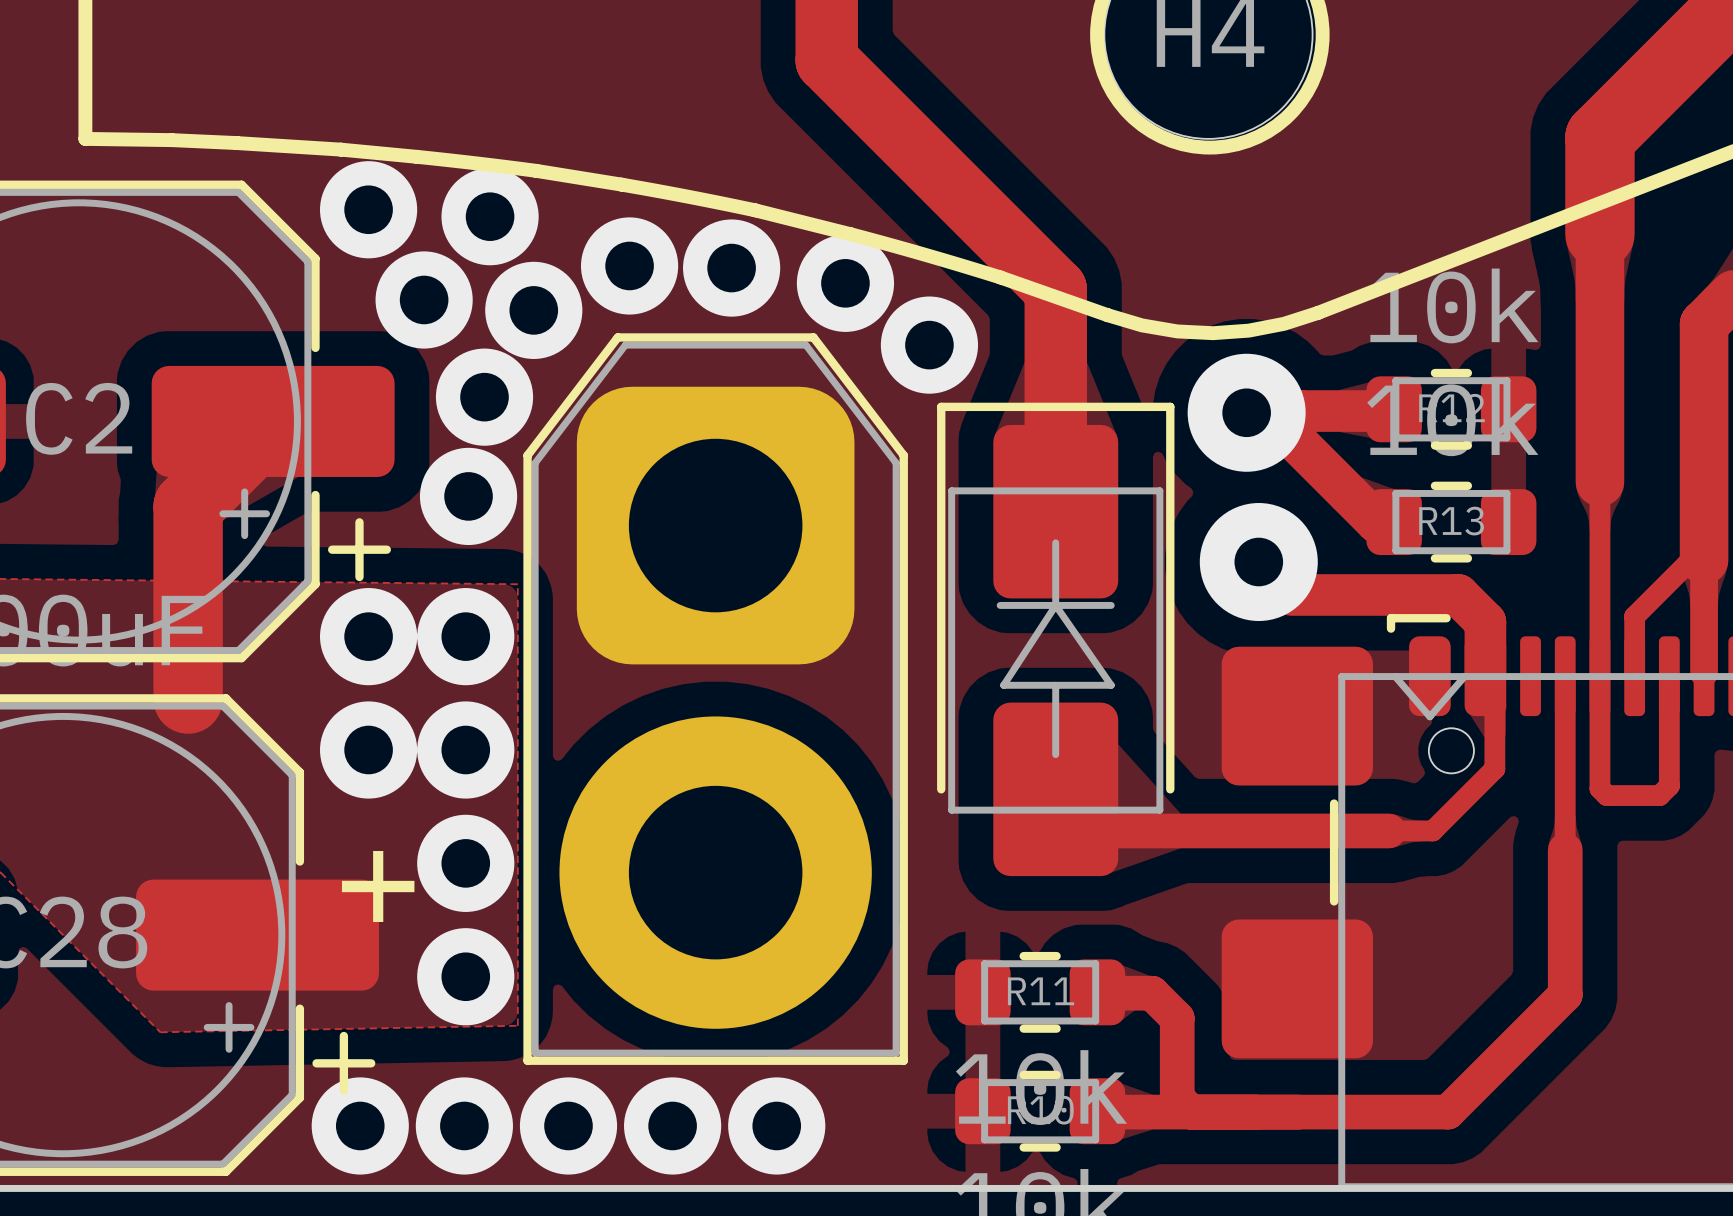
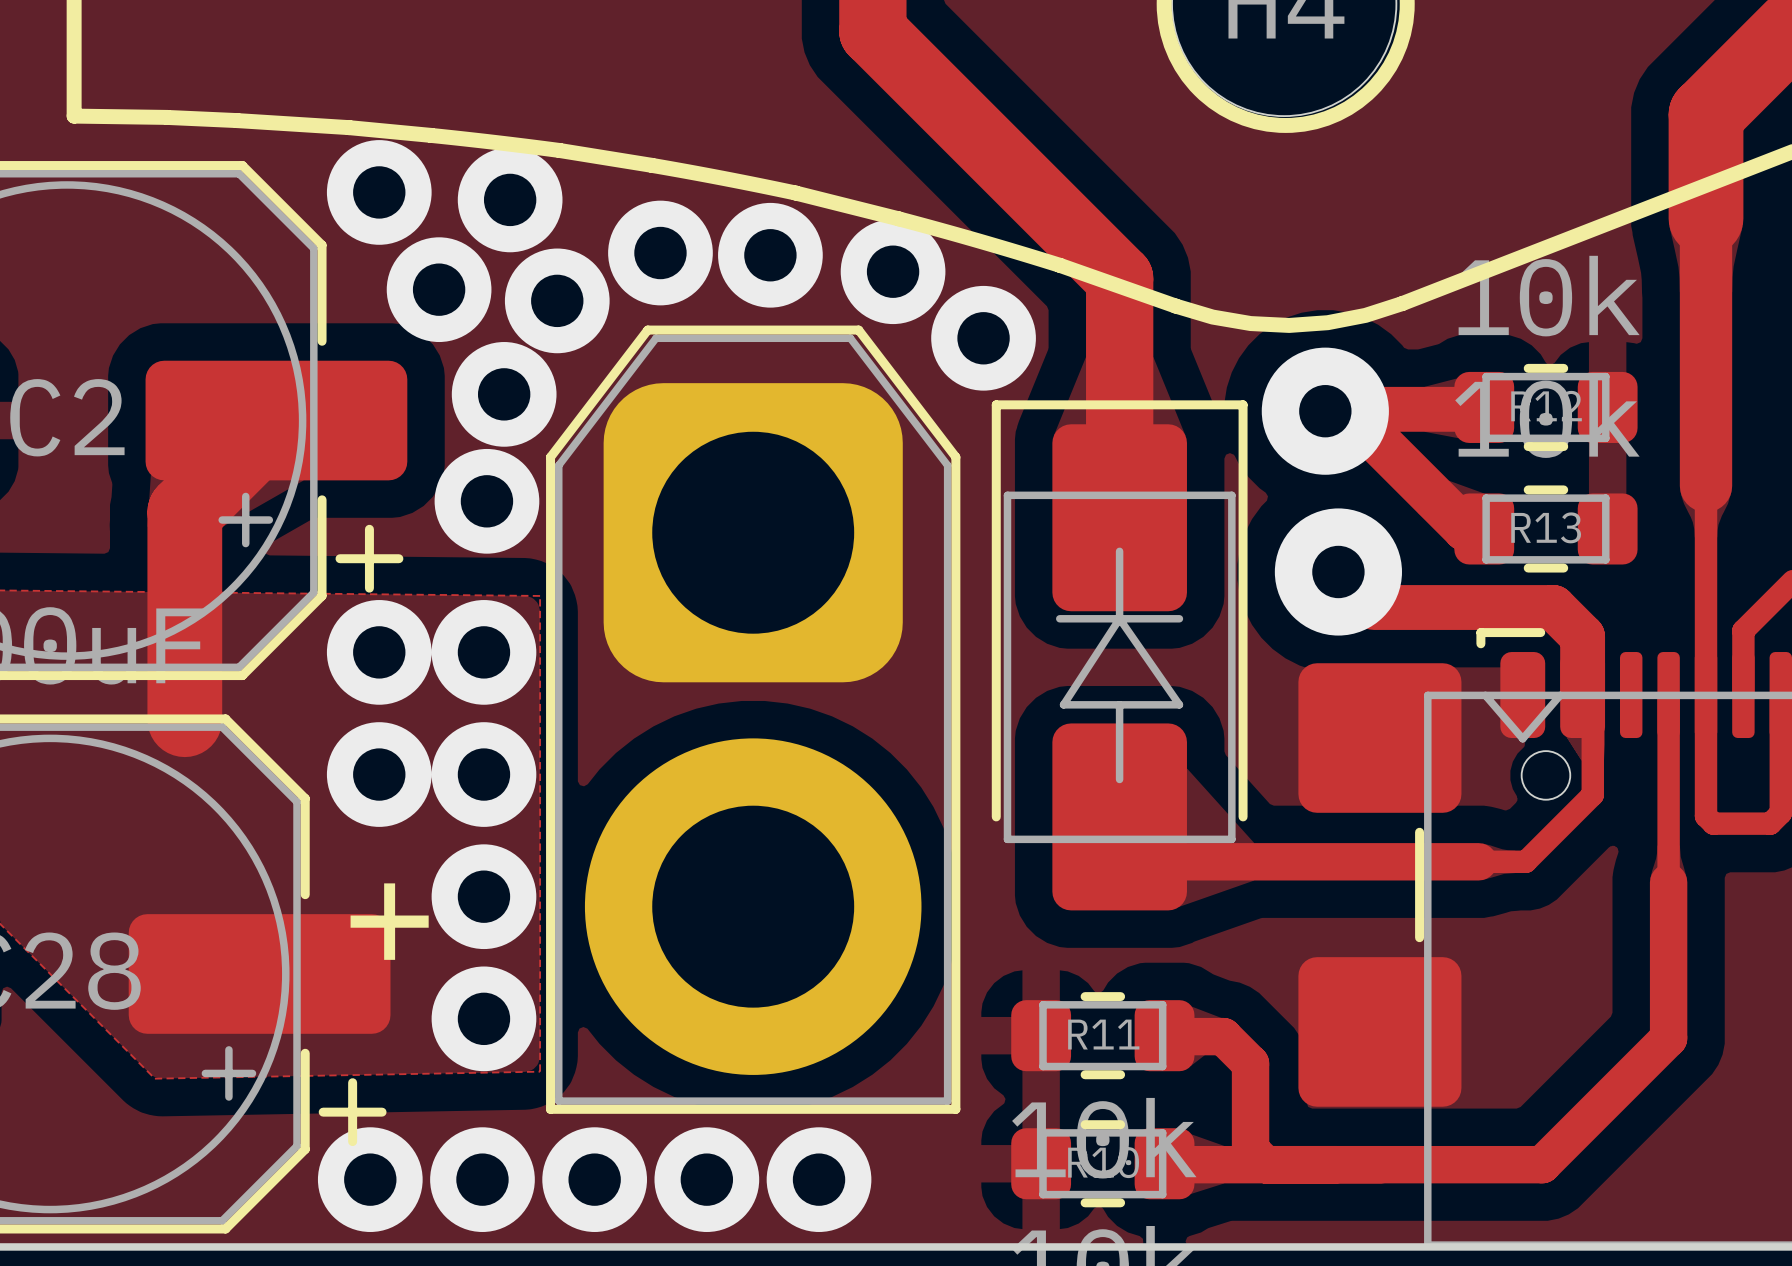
part footprint: [523, 333, 908, 1065] -> [546, 325, 961, 1114]

